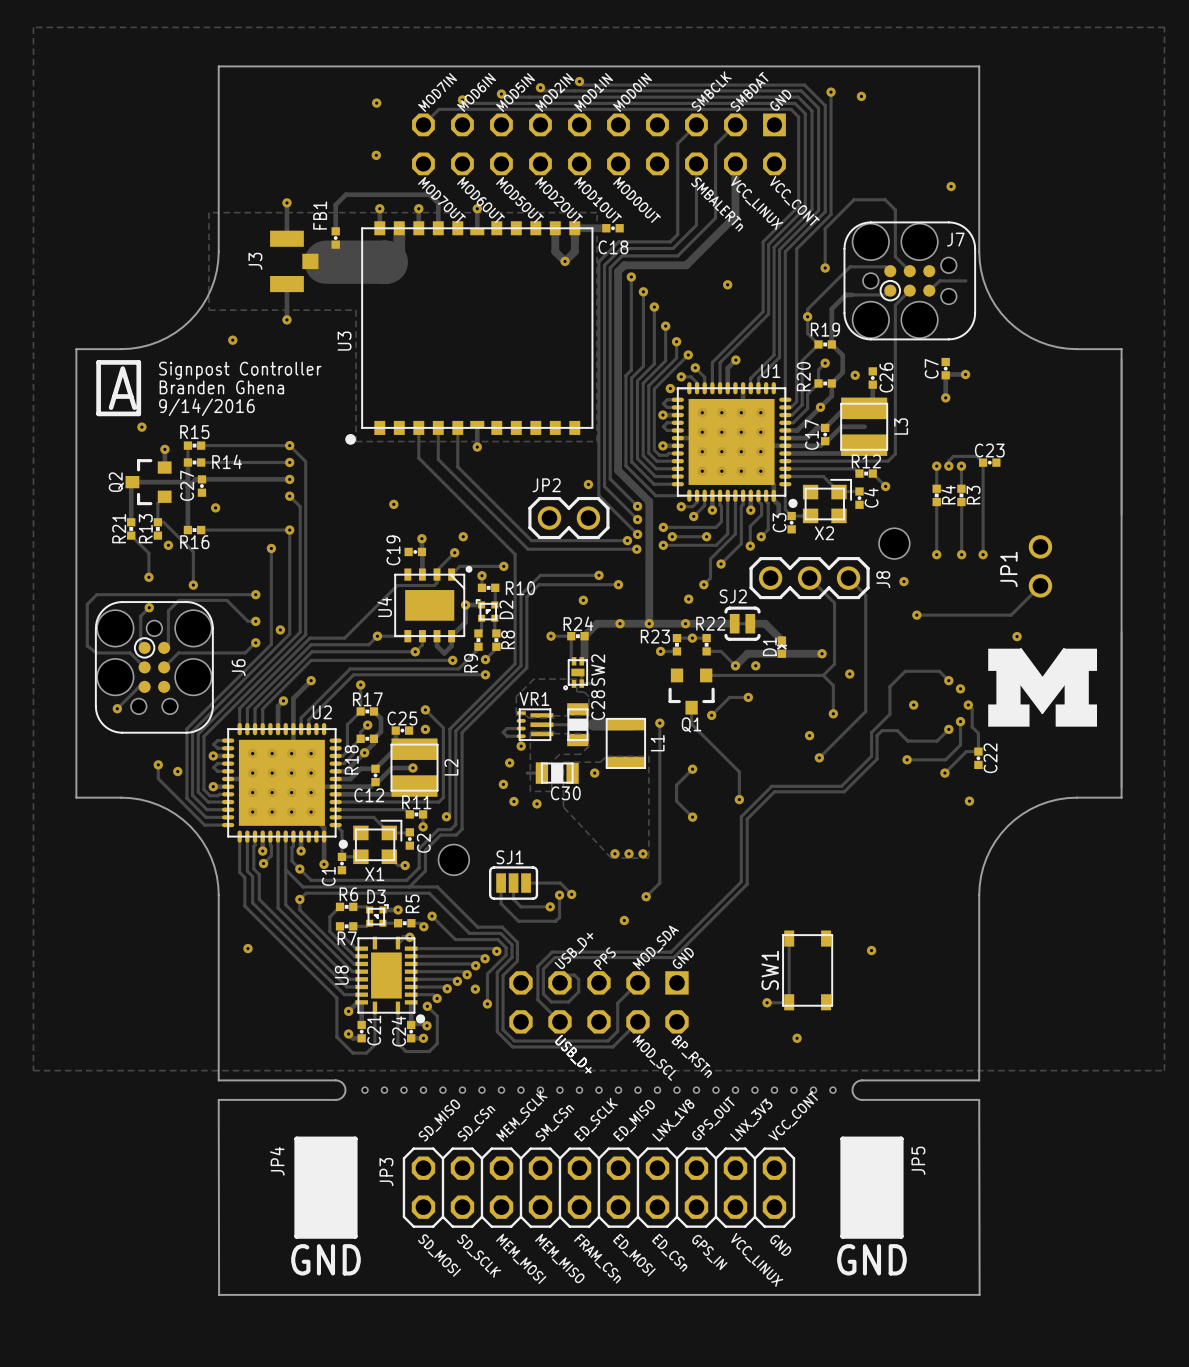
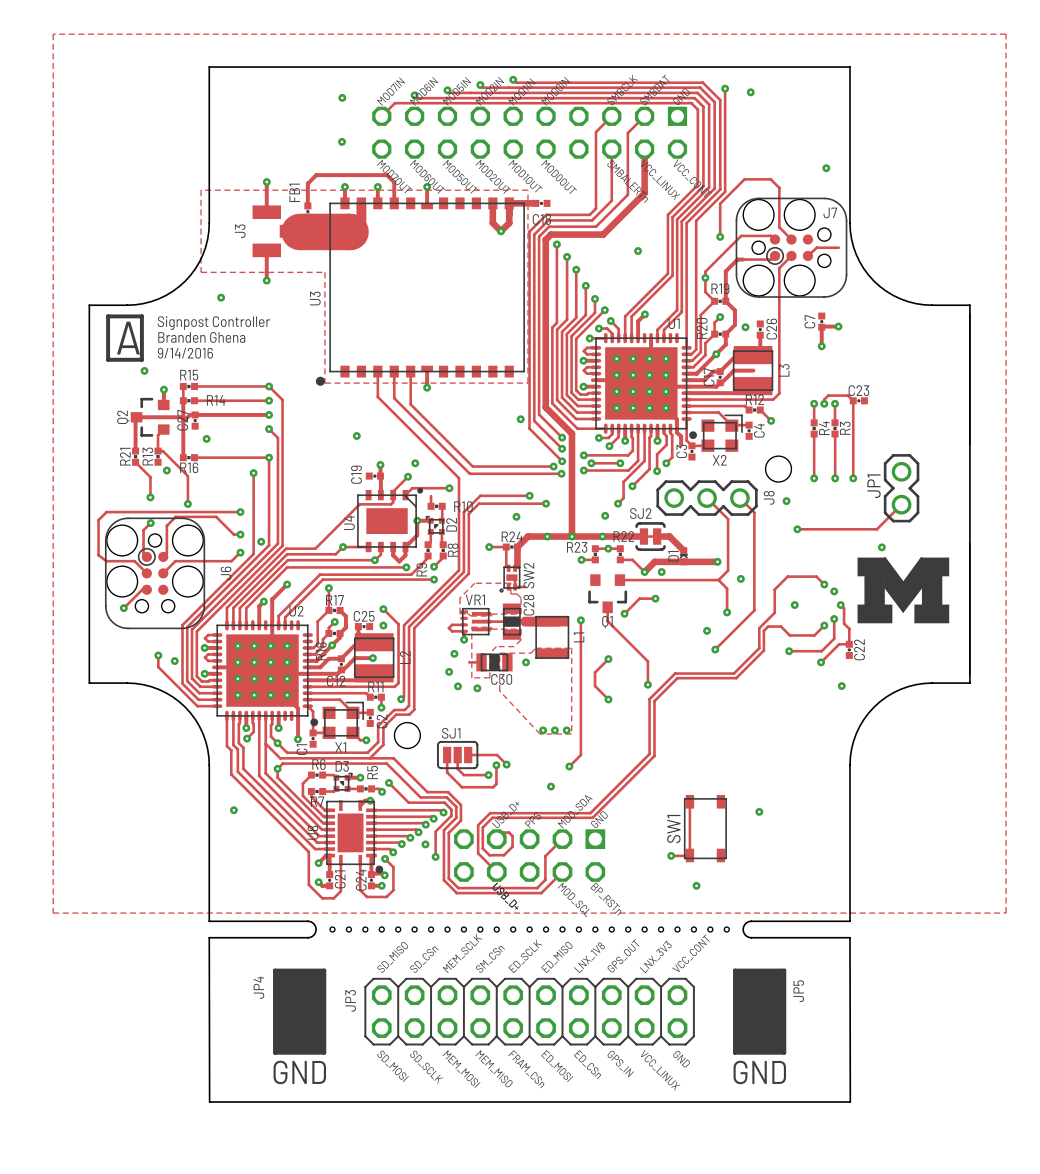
JP2: (568, 518) -> none
JP1 side: bottom (1040, 566) -> top (901, 488)
via: (481, 575) -> none

